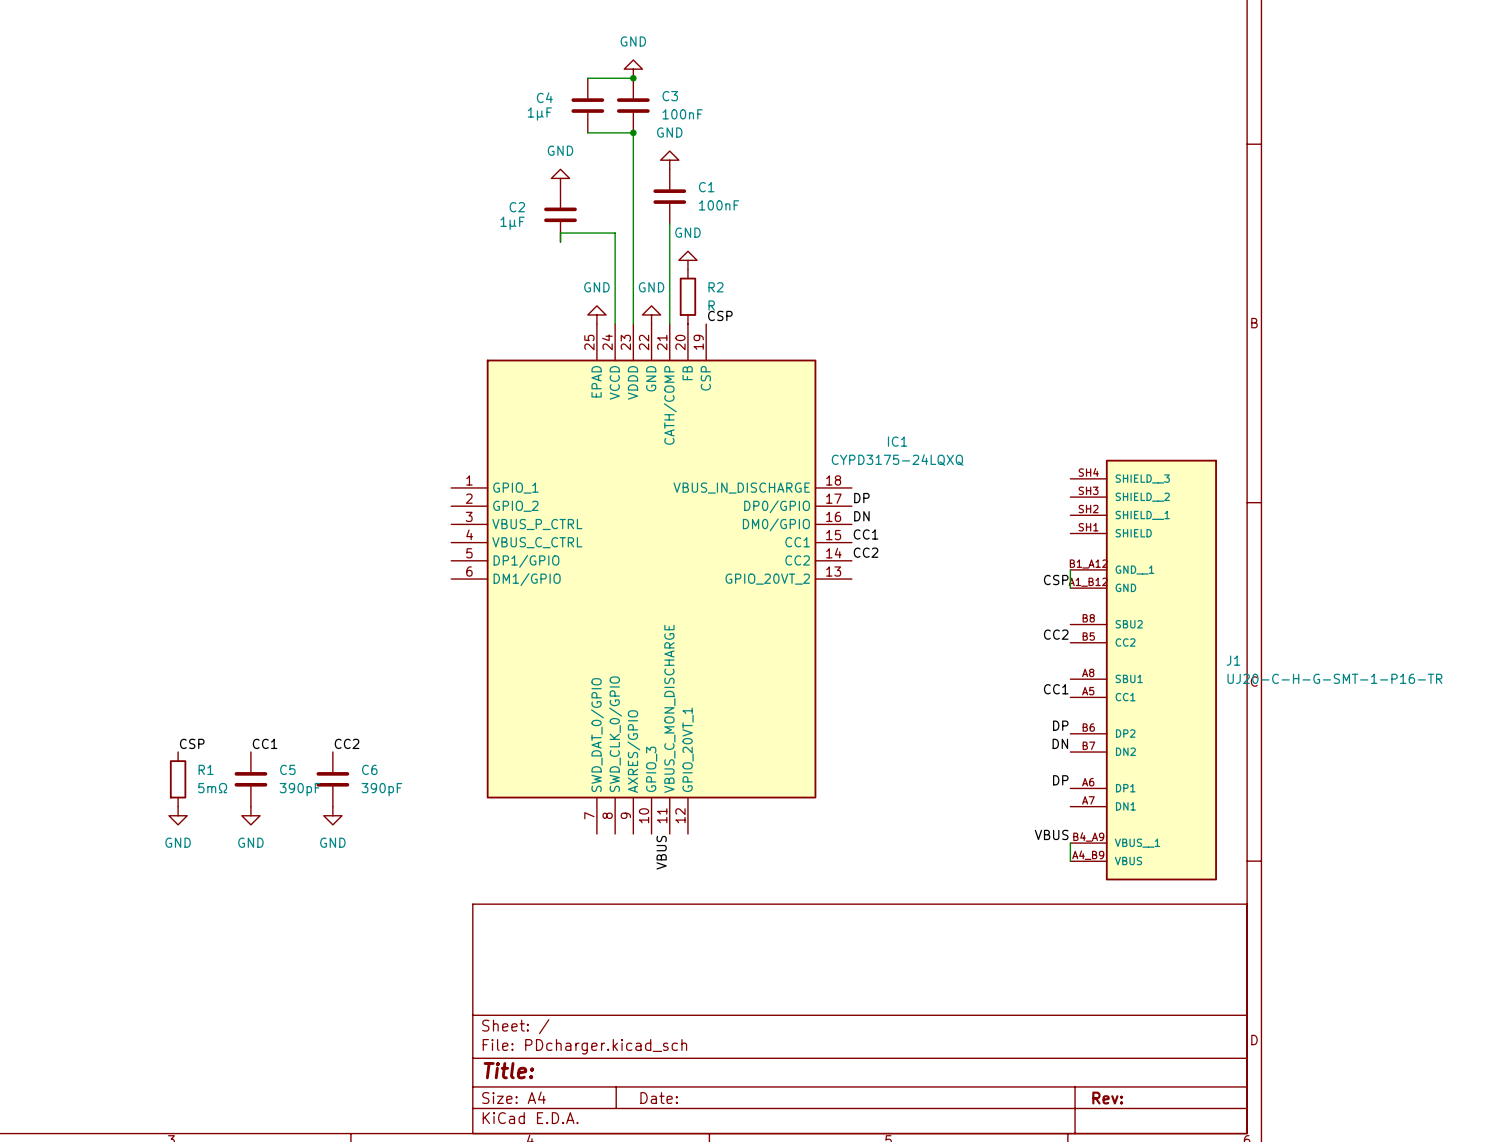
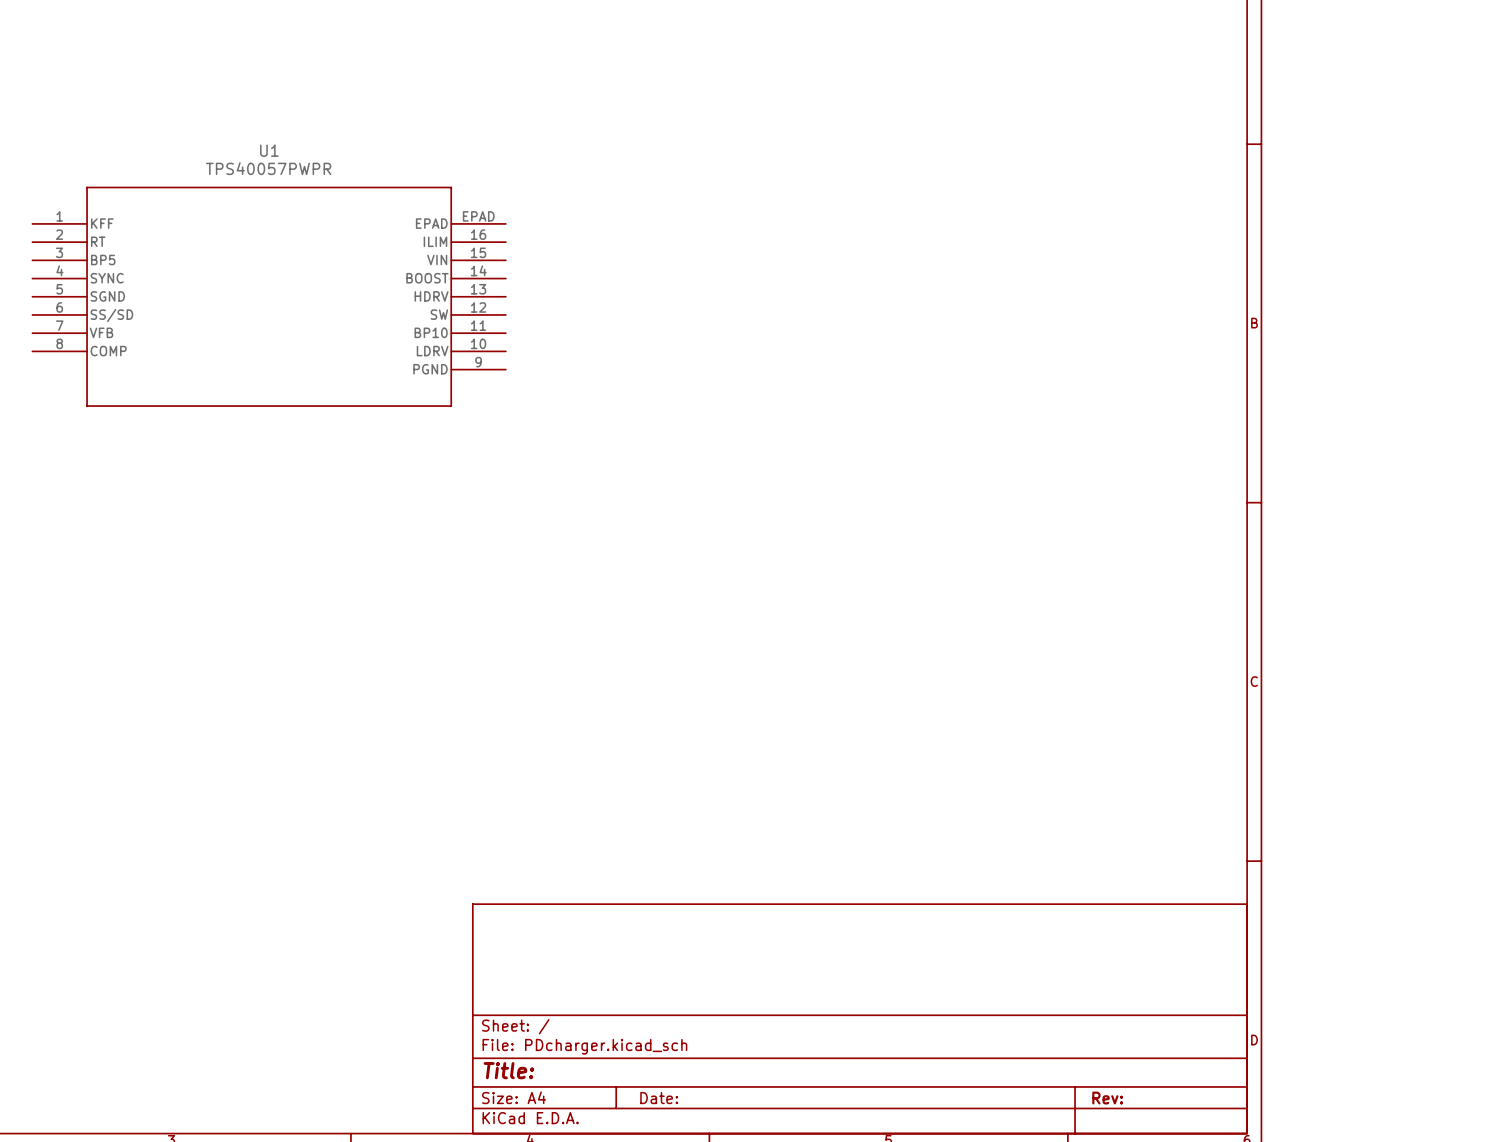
power symbol: GND (633, 69) -> none
wire: (587, 78) (633, 78) -> none
junction: (633, 78) -> none
C4: 1μF (587, 105) -> none
C3: 100nF (633, 105) -> none
wire: (587, 132) (633, 132) (633, 324) -> none
junction: (633, 132) -> none
power symbol: GND (669, 160) -> none
power symbol: GND (560, 178) -> none
C1: 100nF (669, 196) -> none
C2: 1μF (560, 214) -> none
wire: (669, 223) (669, 324) -> none
wire: (560, 242) (560, 233) (615, 233) (615, 324) -> none
power symbol: GND (687, 260) -> none
U1: none -> TPS40057PWPR (269, 296)
R2: R (687, 296) -> none
power symbol: GND (596, 314) -> none
power symbol: GND (651, 314) -> none
label: CSP (720, 315) -> none
label: DP (861, 498) -> none
label: DN (861, 516) -> none
label: CC1 (866, 534) -> none
label: CC2 (866, 552) -> none
wire: (1070, 569) (1070, 588) -> none
IC1: CYPD3175-24LQXQ (651, 579) -> none
label: CSP (1056, 580) -> none
label: CC2 (1056, 634) -> none
J1: UJ20-C-H-G-SMT-1-P16-TR (1143, 670) -> none
label: CC1 (1056, 689) -> none
label: DP (1060, 725) -> none
label: CSP (192, 743) -> none
label: CC1 (265, 743) -> none
label: CC2 (347, 743) -> none
label: DN (1060, 743) -> none
R1: 5mΩ (178, 779) -> none
C5: 390pF (250, 779) -> none
C6: 390pF (332, 779) -> none
label: DP (1060, 780) -> none
power symbol: GND (178, 815) -> none
power symbol: GND (250, 815) -> none
power symbol: GND (332, 815) -> none
label: VBUS (1051, 834) -> none
wire: (1070, 843) (1070, 861) -> none
label: VBUS (661, 852) -> none

